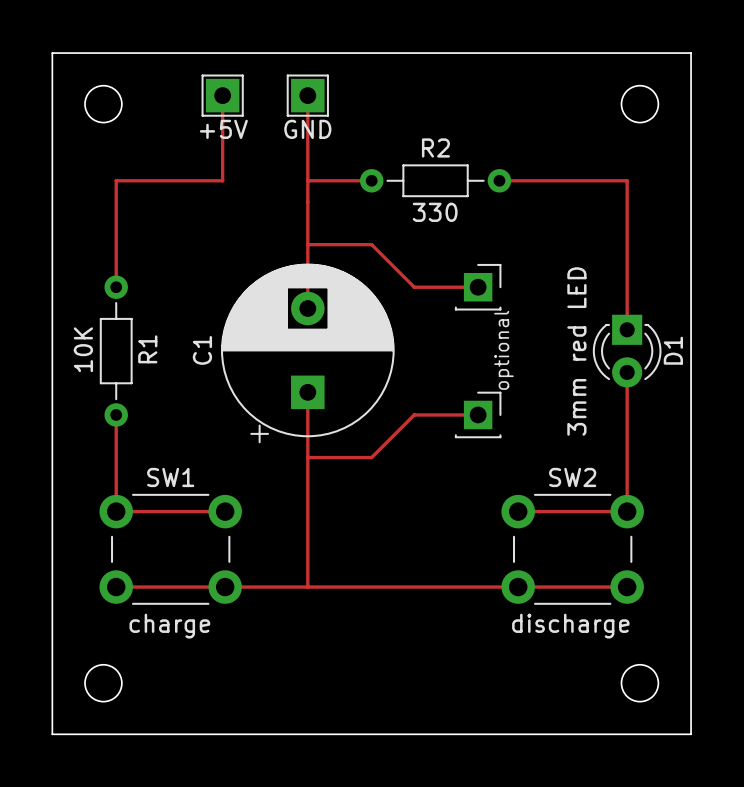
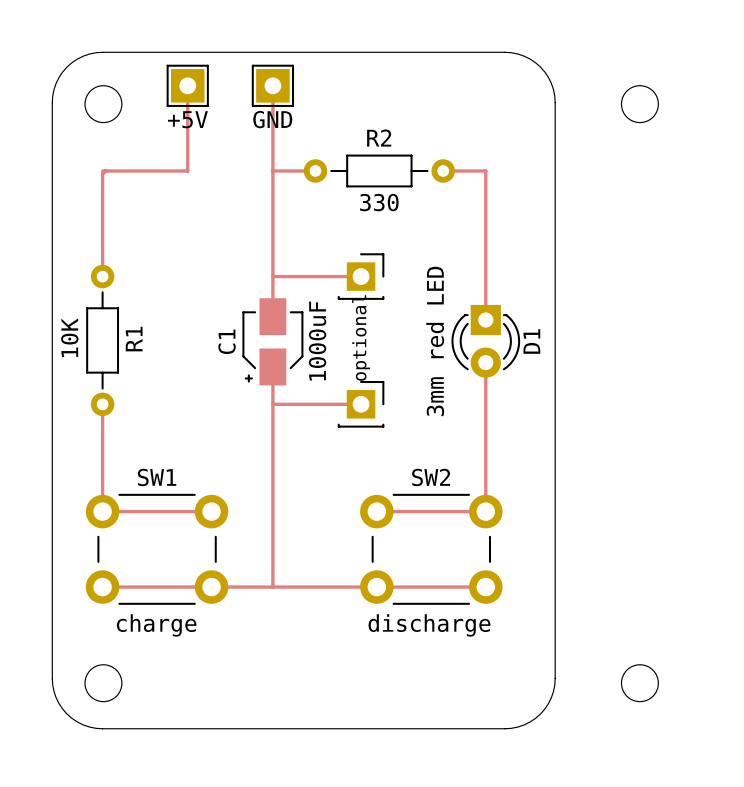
track: none -> (187, 85) (187, 170) (102, 170)
track: none -> (272, 85) (272, 316)
track: (222, 95) (222, 180) (116, 180) (116, 287) -> none
part position: (222, 95) -> (187, 85)
track: (307, 95) (307, 308) -> none
part position: (307, 95) -> (272, 85)
board edge: (52, 102) (52, 53) (691, 53) (691, 734) (52, 734) (52, 678) -> (52, 102) (56, 83) (67, 67) (83, 56) (102, 52) (511, 52) (530, 59) (544, 71) (553, 89) (555, 102) (555, 678) (553, 691) (544, 709) (535, 718) (524, 724) (504, 728) (102, 728) (83, 724) (67, 714) (56, 697) (52, 678)
track: none -> (105, 170) (102, 173) (102, 276)
track: none -> (272, 170) (315, 170)
track: none -> (443, 170) (485, 170) (485, 320)
track: (307, 180) (371, 180) -> none
R2 position: (435, 180) -> (379, 170)
track: (499, 180) (627, 180) (627, 329) -> none
track: (307, 244) (371, 244) (414, 287) (478, 287) -> none
C1 footprint: [220, 263, 395, 444] -> [242, 298, 304, 386]
track: none -> (272, 276) (361, 276)
part: none -> (361, 276)
part: (478, 287) -> none
C1 value: none -> 1000uF (317, 341)
C1 name position: C1 (202, 350) -> C1 (227, 341)
text position: optional (503, 350) -> optional (361, 338)
R1 position: (116, 351) -> (102, 340)
D1 position: (627, 351) -> (485, 341)
track: none -> (485, 362) (485, 511) (376, 511)
track: none -> (272, 366) (272, 587)
track: (627, 372) (627, 511) (518, 511) -> none
track: (307, 392) (307, 587) -> none
track: none -> (102, 404) (102, 511)
track: none -> (272, 404) (361, 404)
part: none -> (361, 404)
track: (116, 414) (116, 511) -> none
track: (478, 414) (414, 414) (371, 457) (307, 457) -> none
part: (478, 414) -> none
SW1 position: (170, 549) -> (157, 549)
SW2 position: (572, 549) -> (431, 549)
track: (485, 587) (627, 587) -> none

